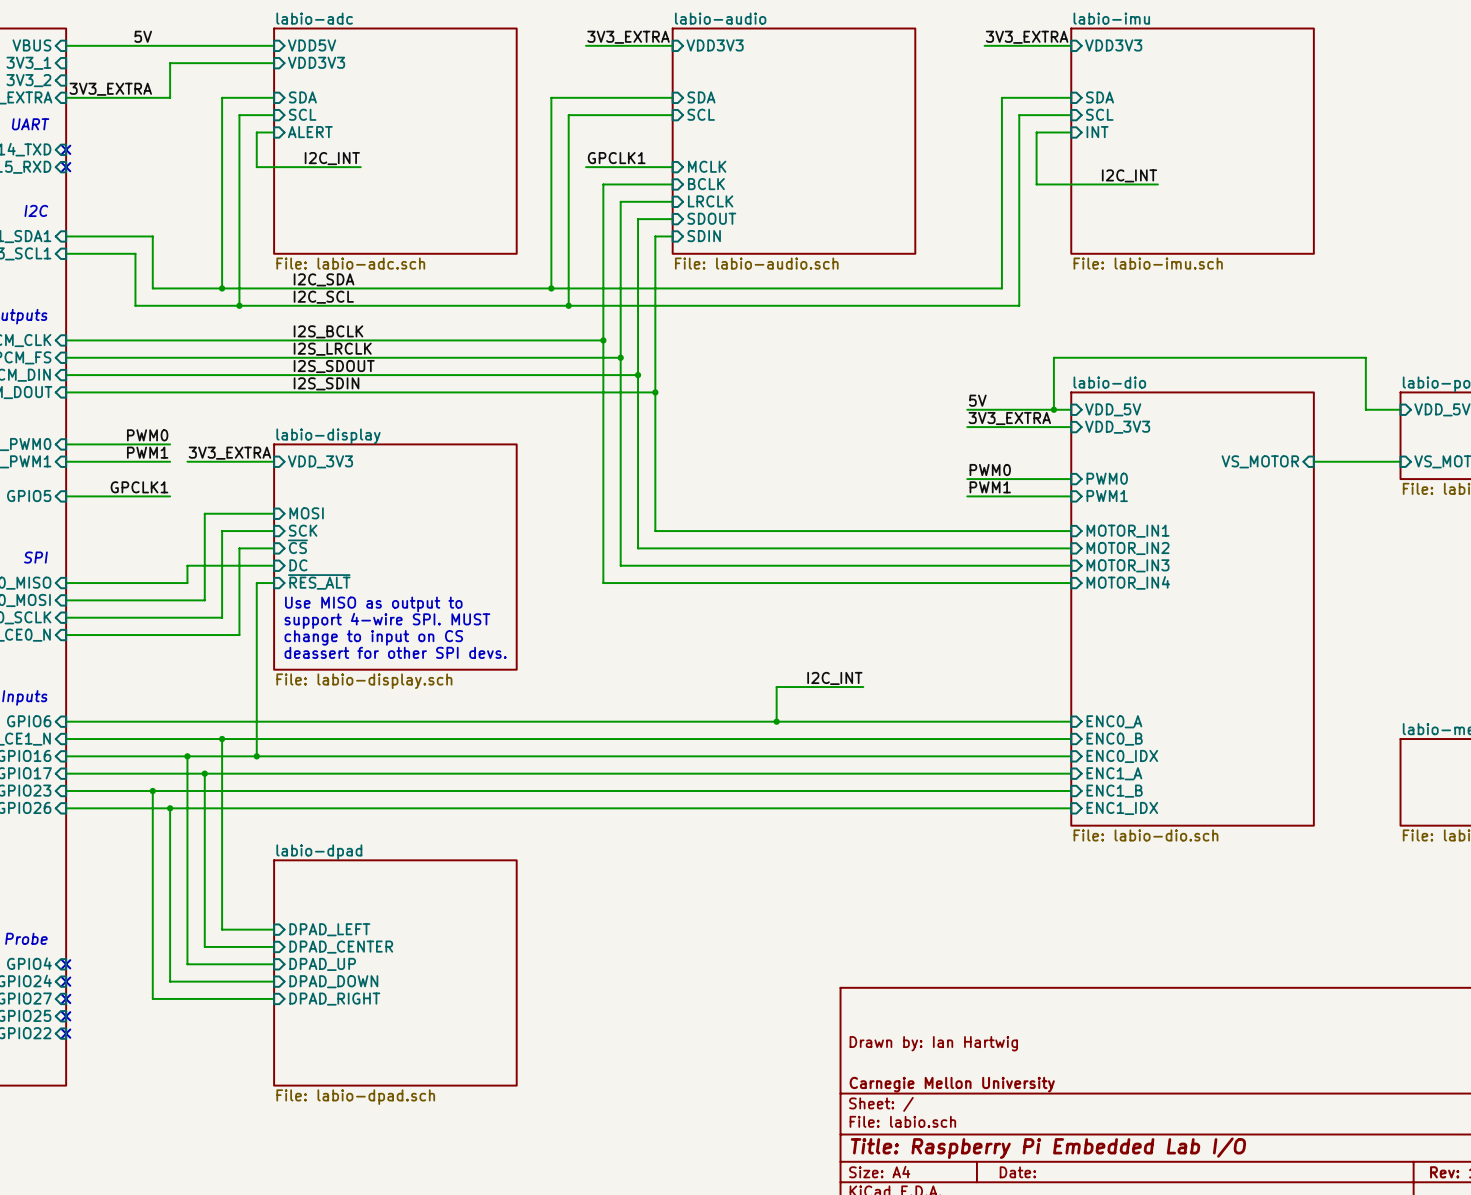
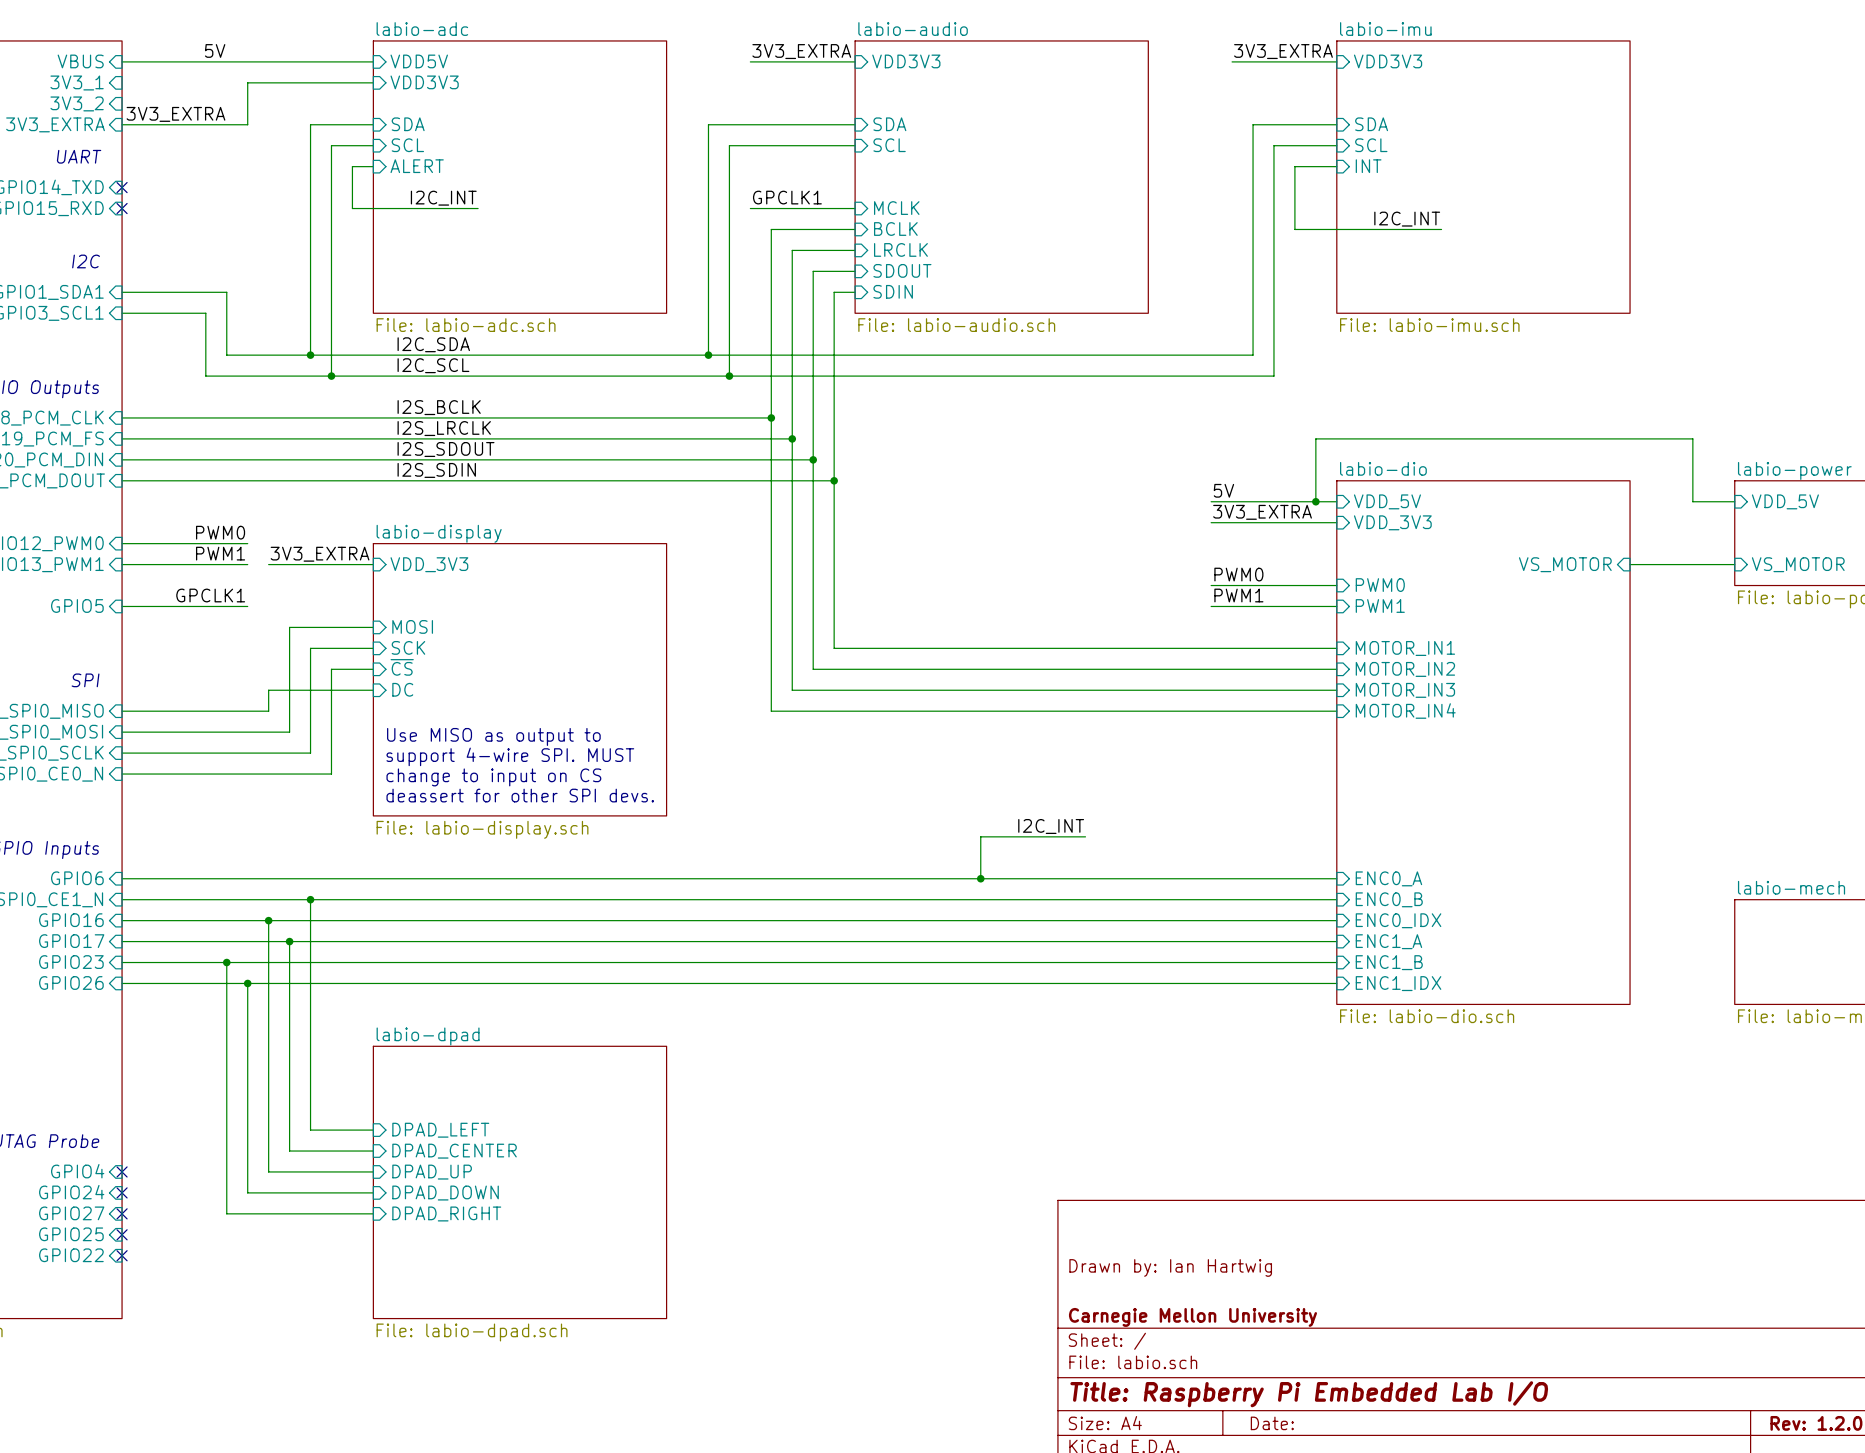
sheet pin: ~{RES_ALT} (319, 581) -> none
wire: (274, 583) (256, 583) (256, 756) -> none
junction: (256, 756) -> none

